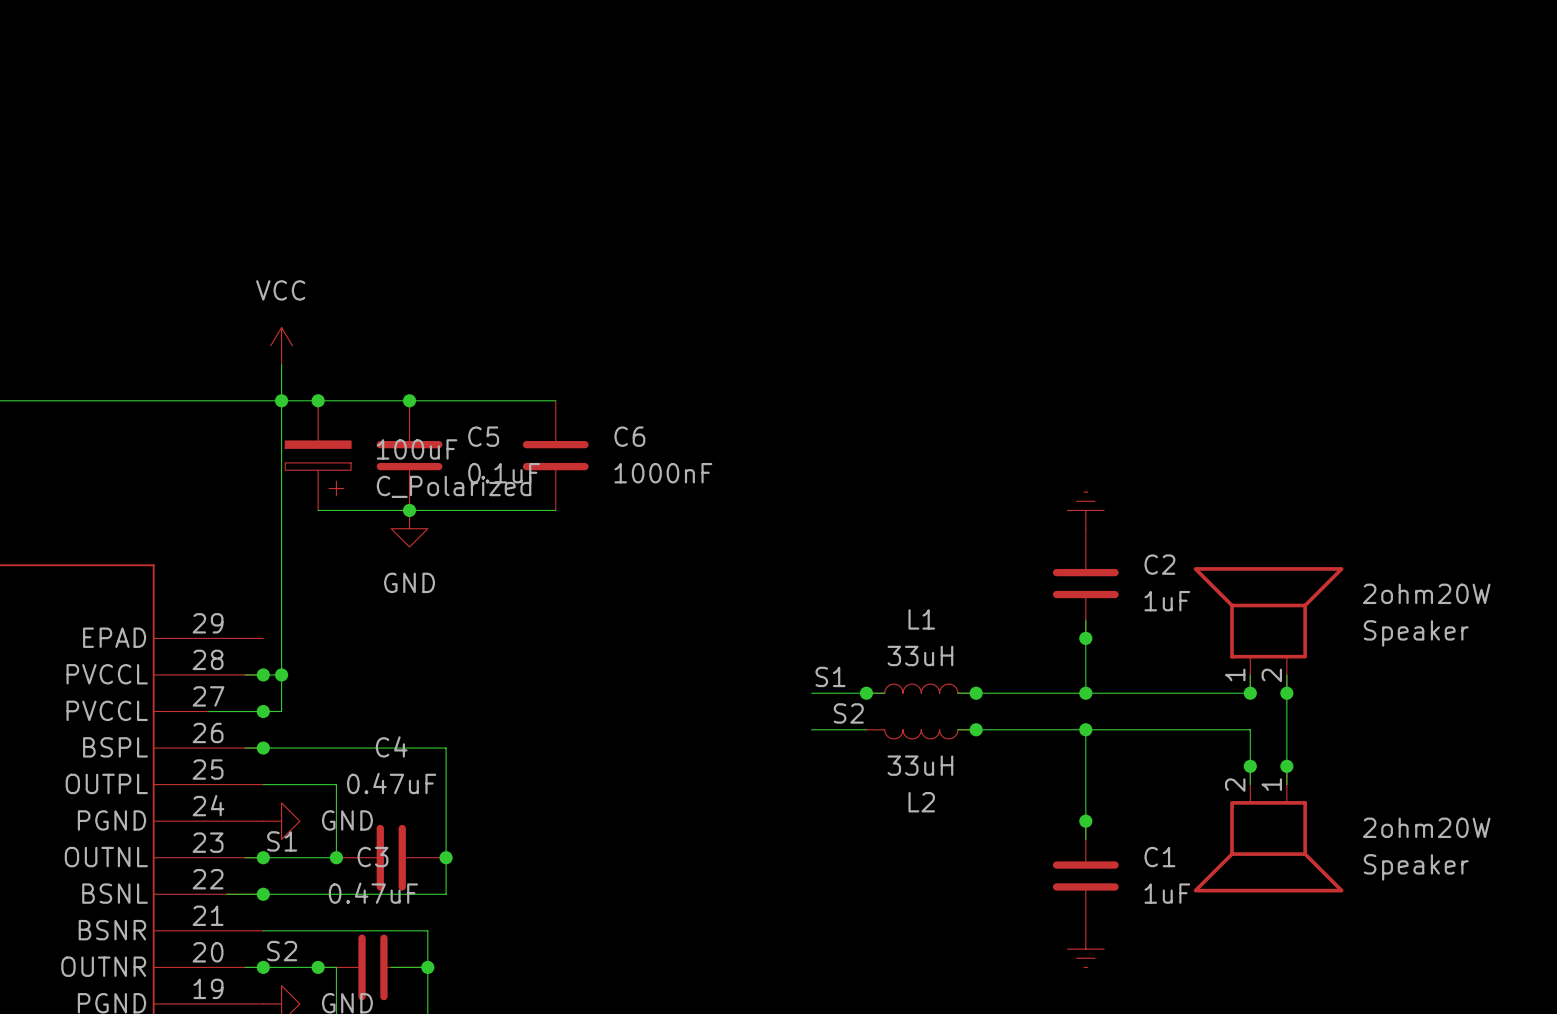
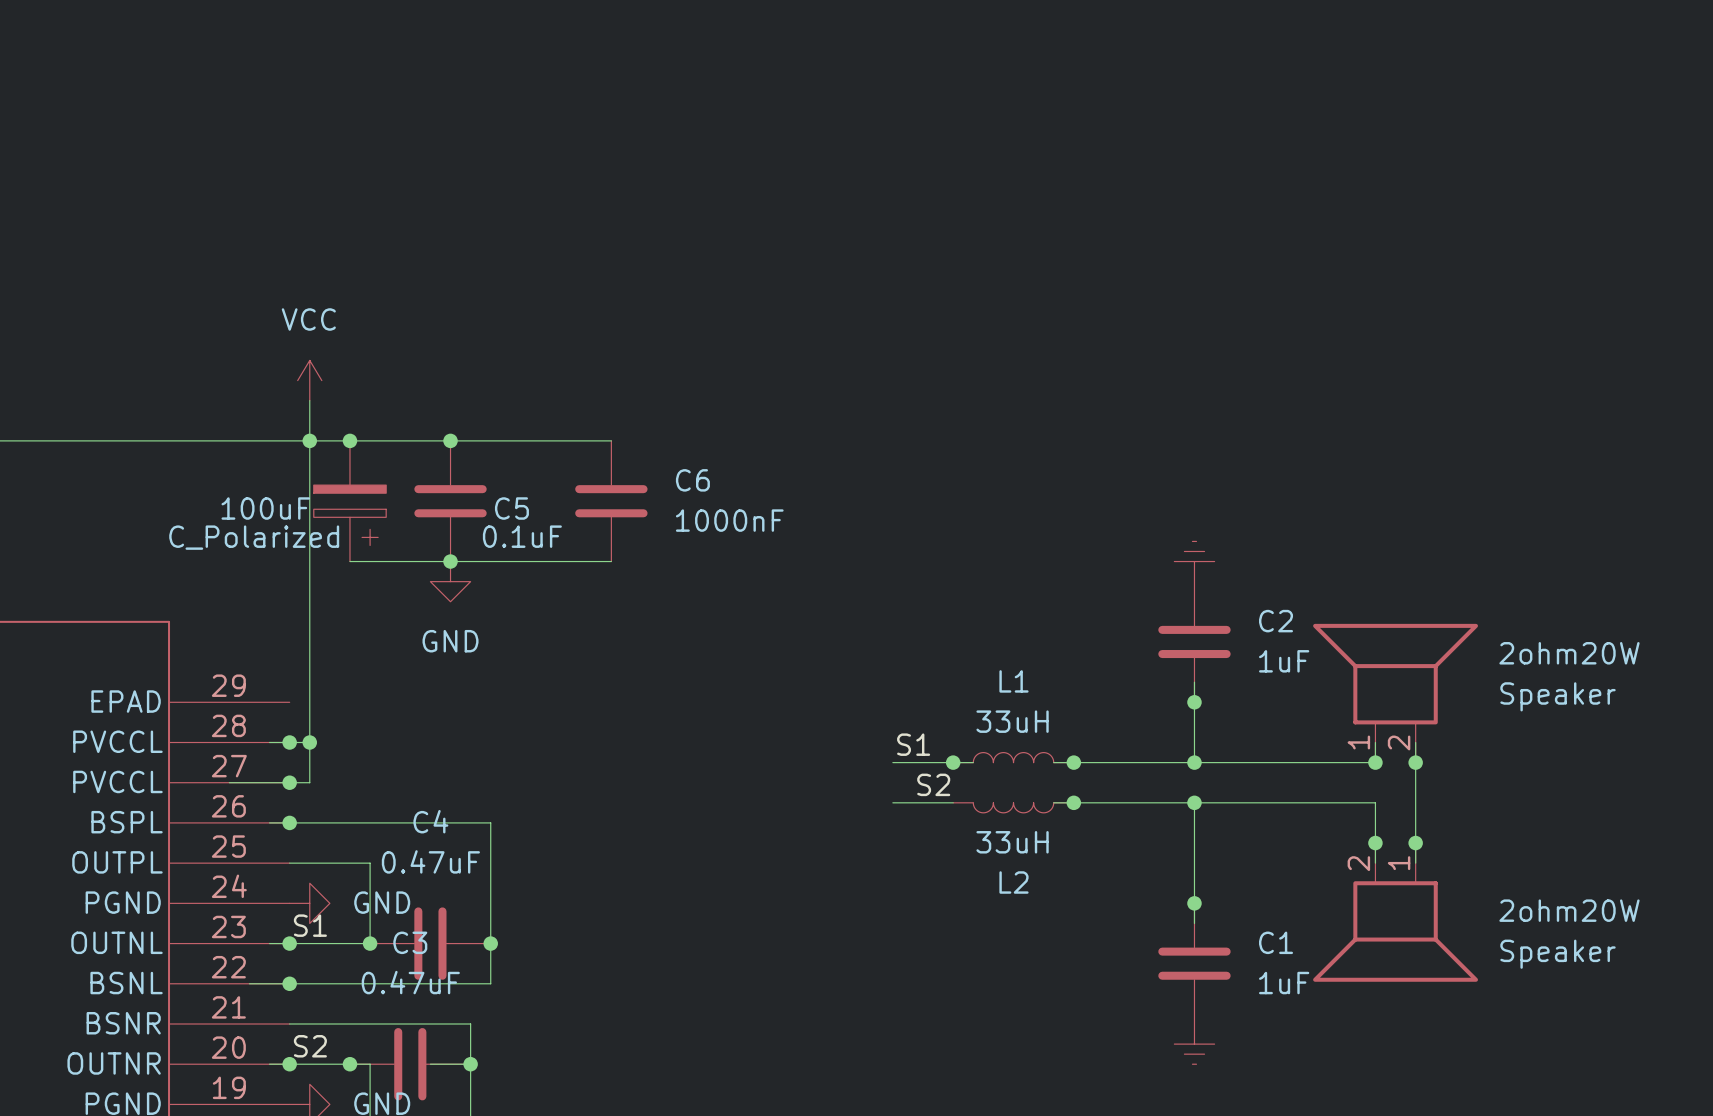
C5 name position: C5 (483, 436) -> C5 (511, 508)
100uF name position: 100uF (417, 449) -> 100uF (265, 508)
C5 value position: 0.1uF (504, 473) -> 0.1uF (522, 536)
100uF value position: C_Polarized (454, 486) -> C_Polarized (254, 537)

